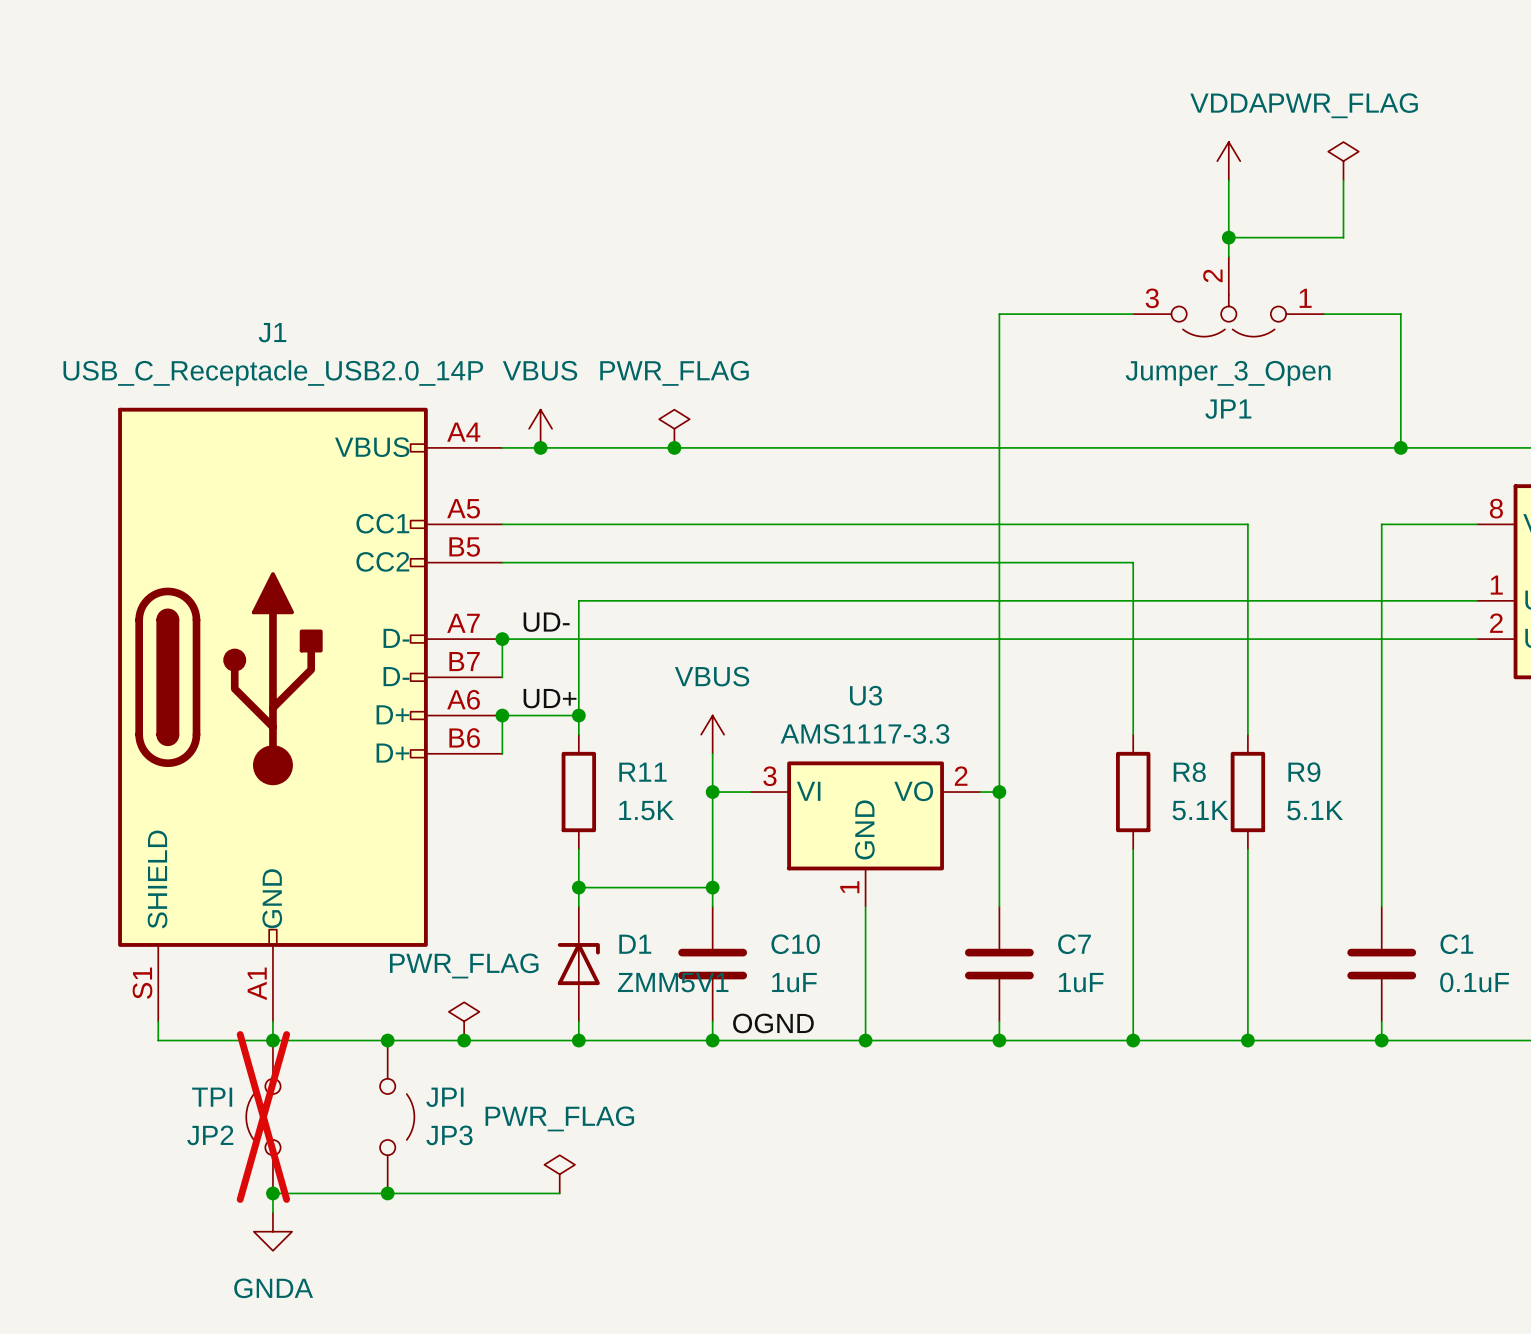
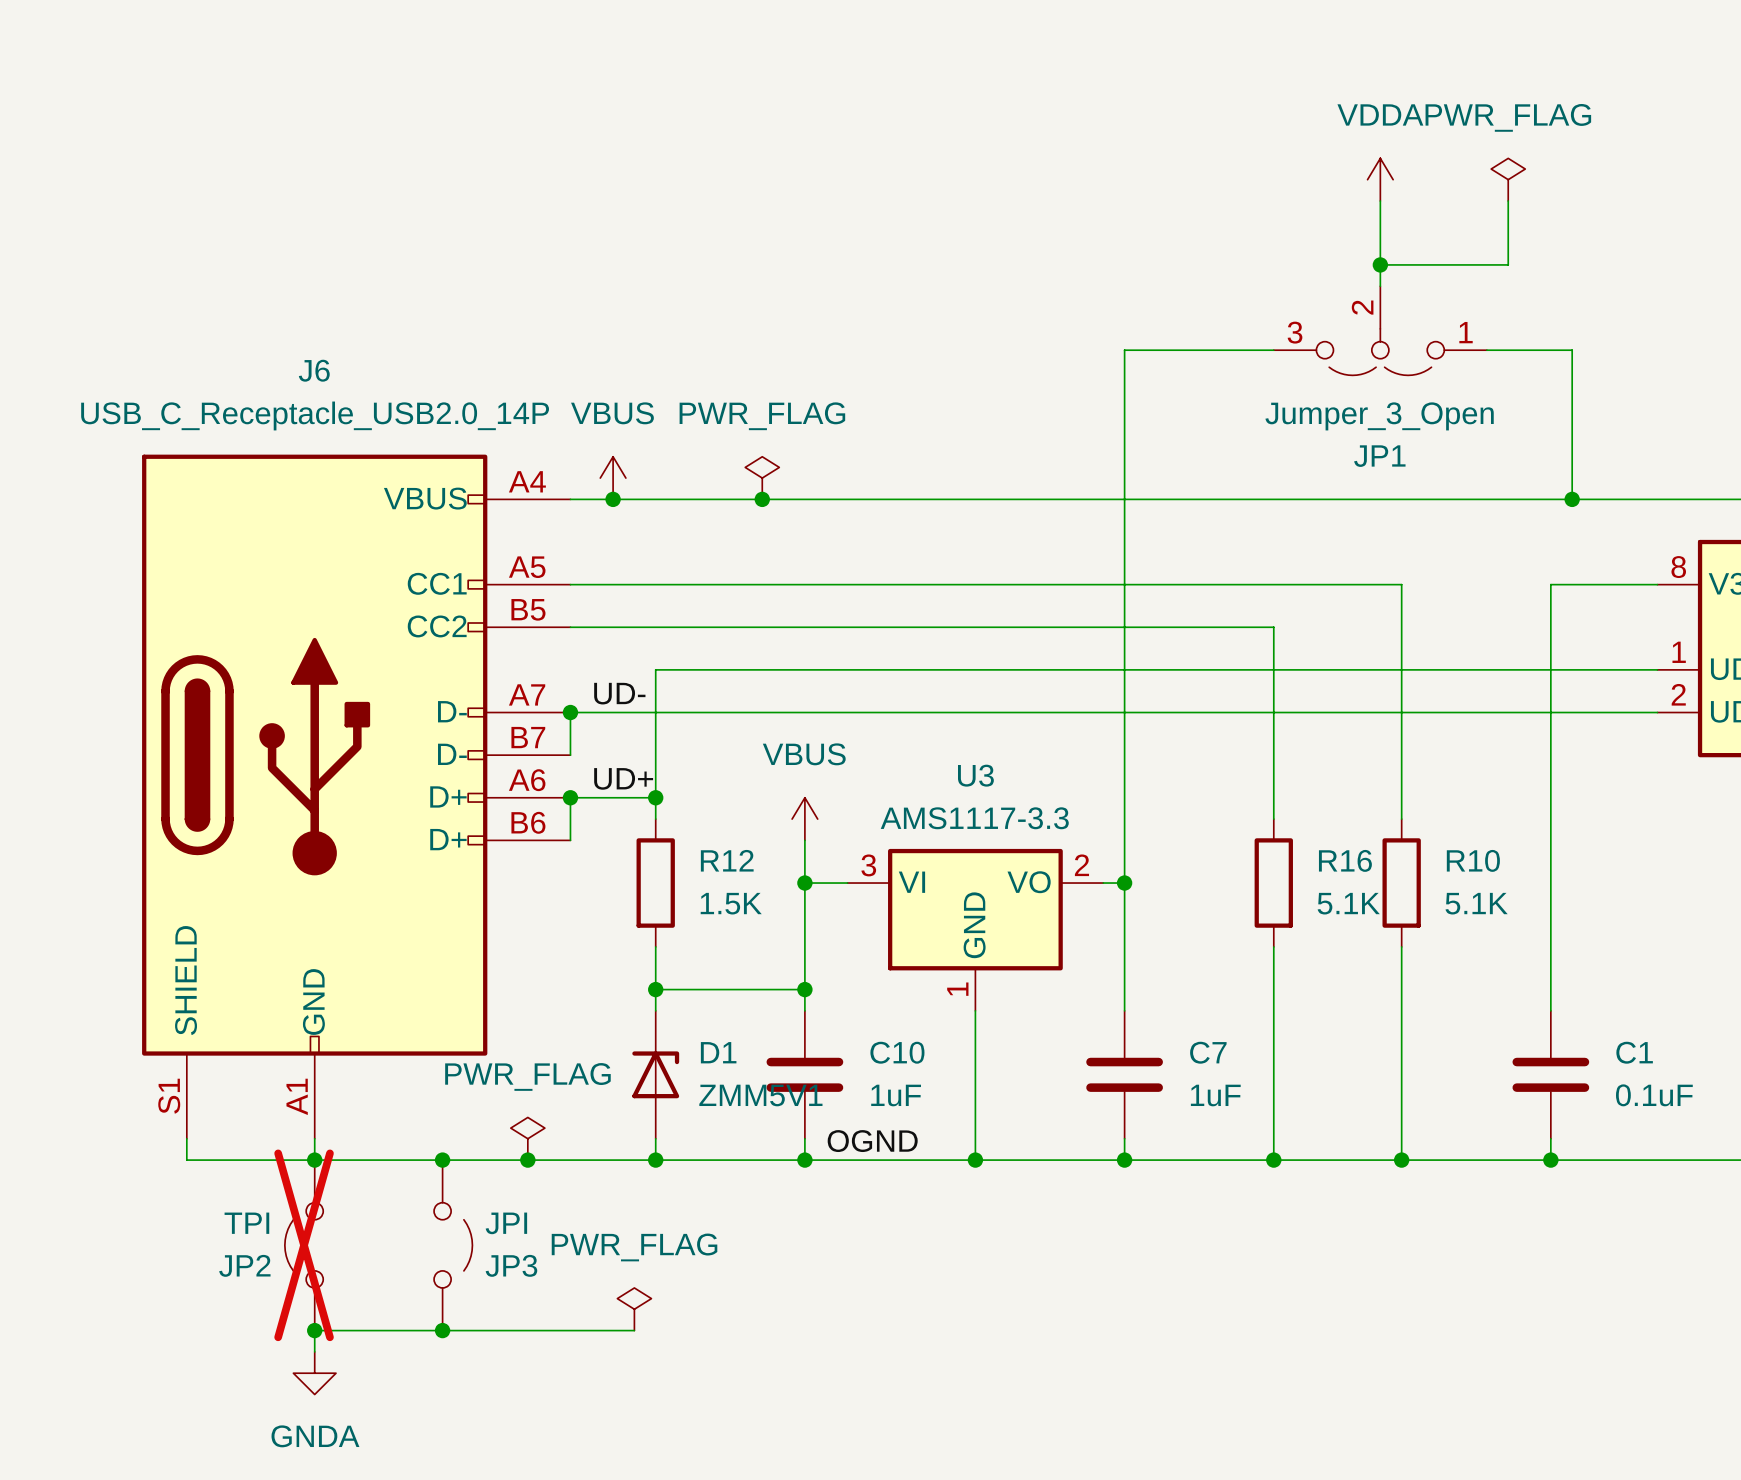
J1 name: J1 (272, 332) -> J6 (314, 370)
R11 name: R11 (643, 772) -> R12 (727, 860)
R8 name: R8 (1189, 772) -> R16 (1345, 860)
R9 name: R9 (1304, 772) -> R10 (1473, 860)

